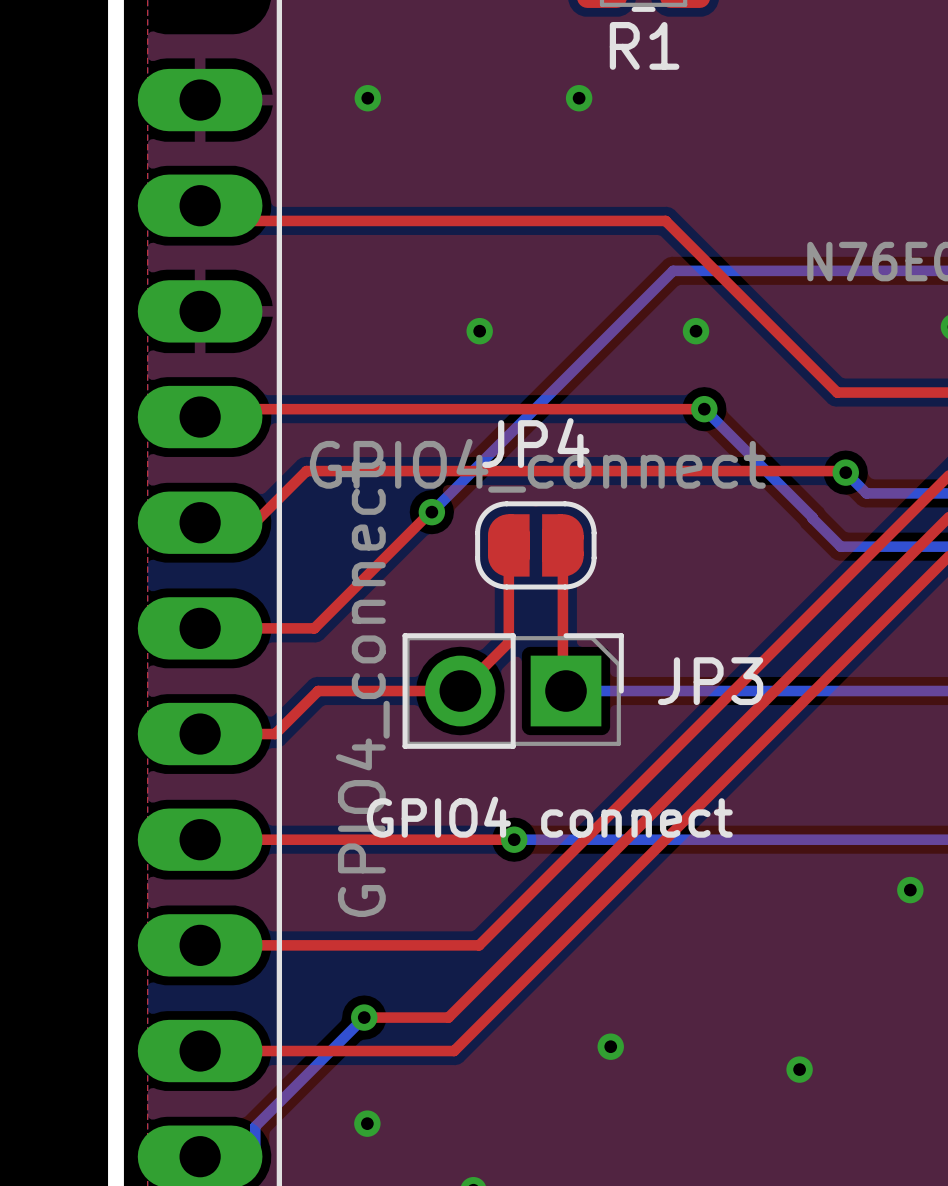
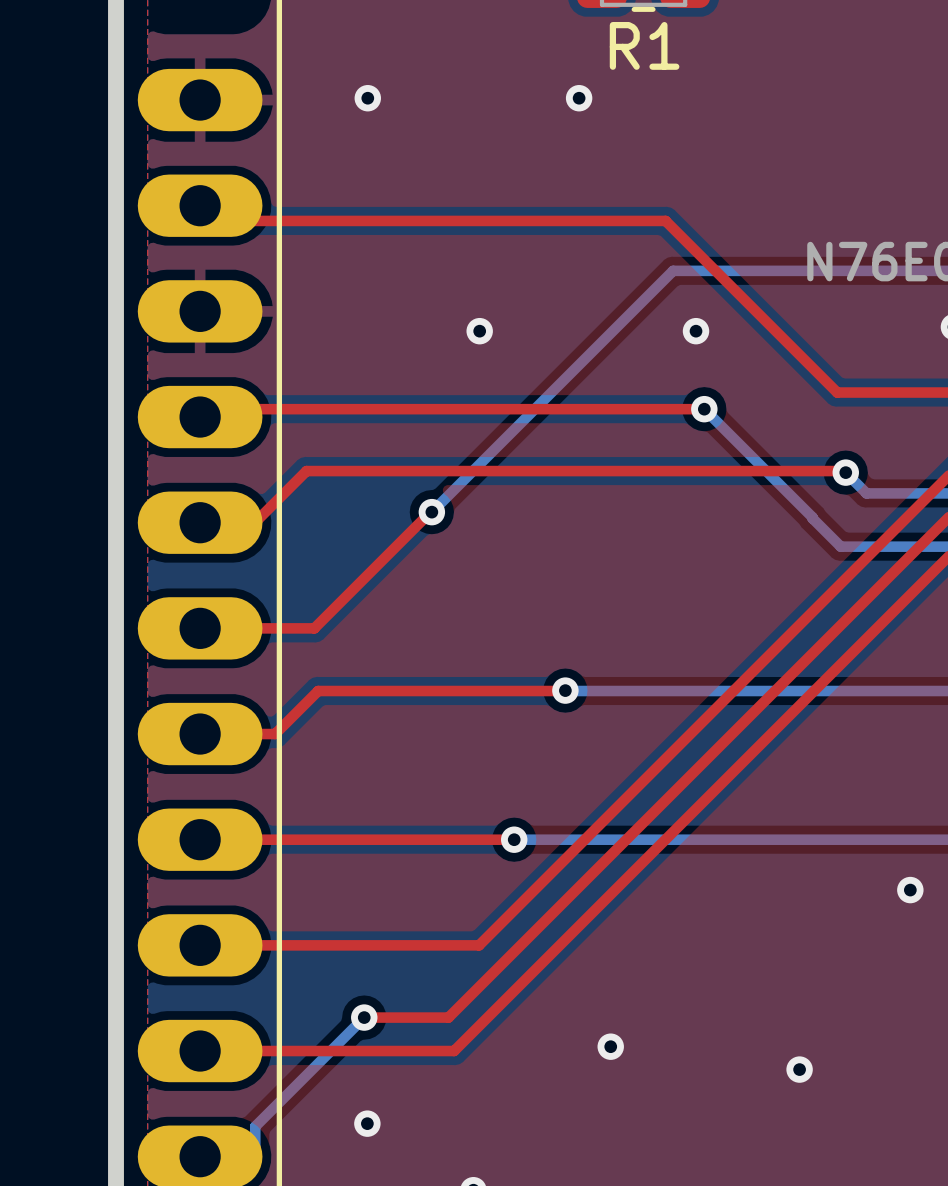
JP4: GPIO4_connect (535, 545) -> none
top track: (508, 549) (508, 642) (460, 691) -> (564, 691) (460, 691)
top track: (566, 569) (562, 572) (562, 687) -> none
via: none -> (565, 690)
JP3: GPIO4_connect (513, 691) -> none
text: GPIO4 connect (549, 817) -> none

